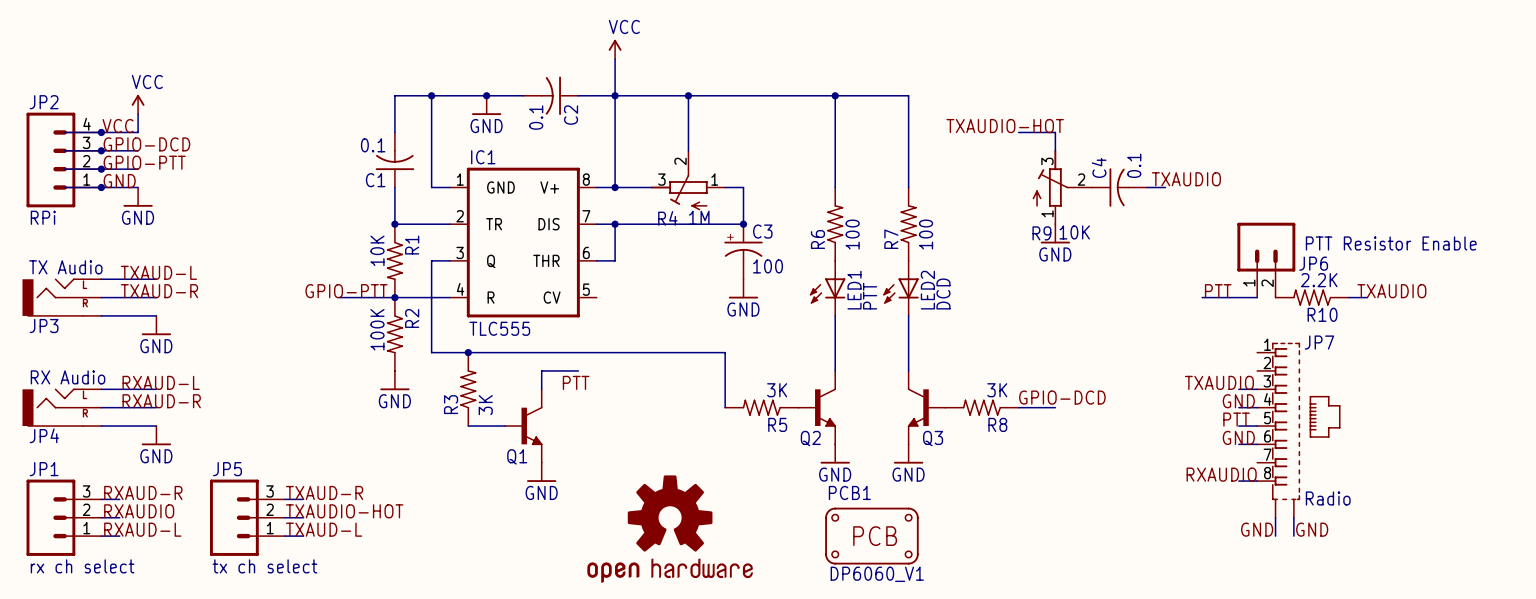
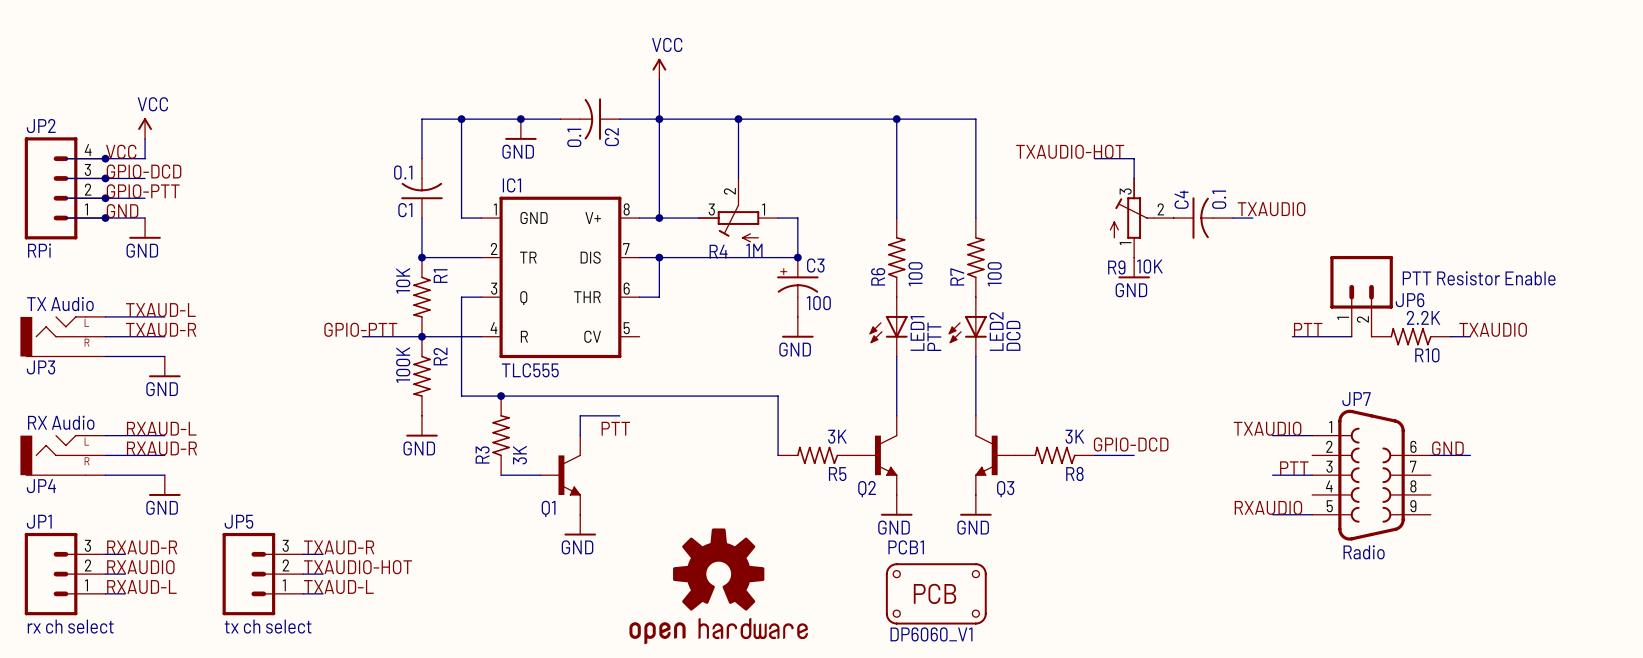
JP7 symbol: [1257, 342, 1341, 518] -> [1312, 409, 1431, 541]
JP7 name position: JP7 (1319, 342) -> JP7 (1356, 399)
label position: TXAUDIO (1219, 382) -> TXAUDIO (1267, 428)
wire: none -> (1272, 435) (1312, 435)
label: GND (1238, 401) -> none
label: none -> GND (1447, 448)
wire: none -> (1430, 455) (1470, 455)
label position: PTT (1236, 419) -> PTT (1294, 468)
wire: none -> (1272, 475) (1312, 475)
label: GND (1238, 437) -> none
wire: none -> (1272, 514) (1312, 514)
label position: RXAUDIO (1221, 474) -> RXAUDIO (1268, 507)
wire: (1238, 481) (1257, 481) -> none
JP7 value position: Radio (1328, 498) -> Radio (1364, 552)
wire: (1275, 517) (1275, 536) -> none
wire: (1293, 517) (1293, 536) -> none
label: GND (1257, 529) -> none
label: GND (1312, 529) -> none

